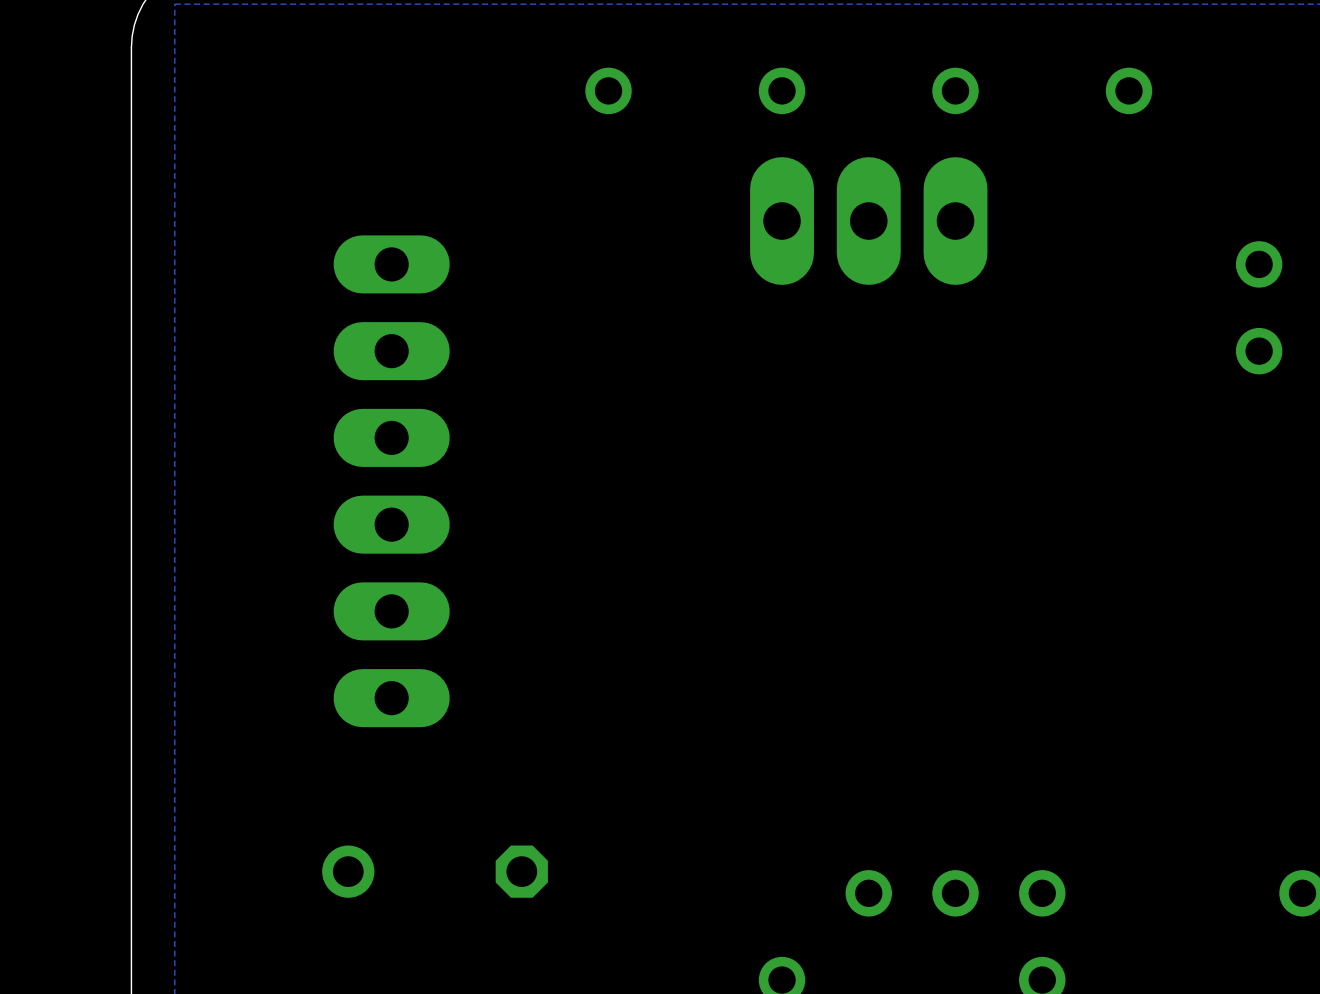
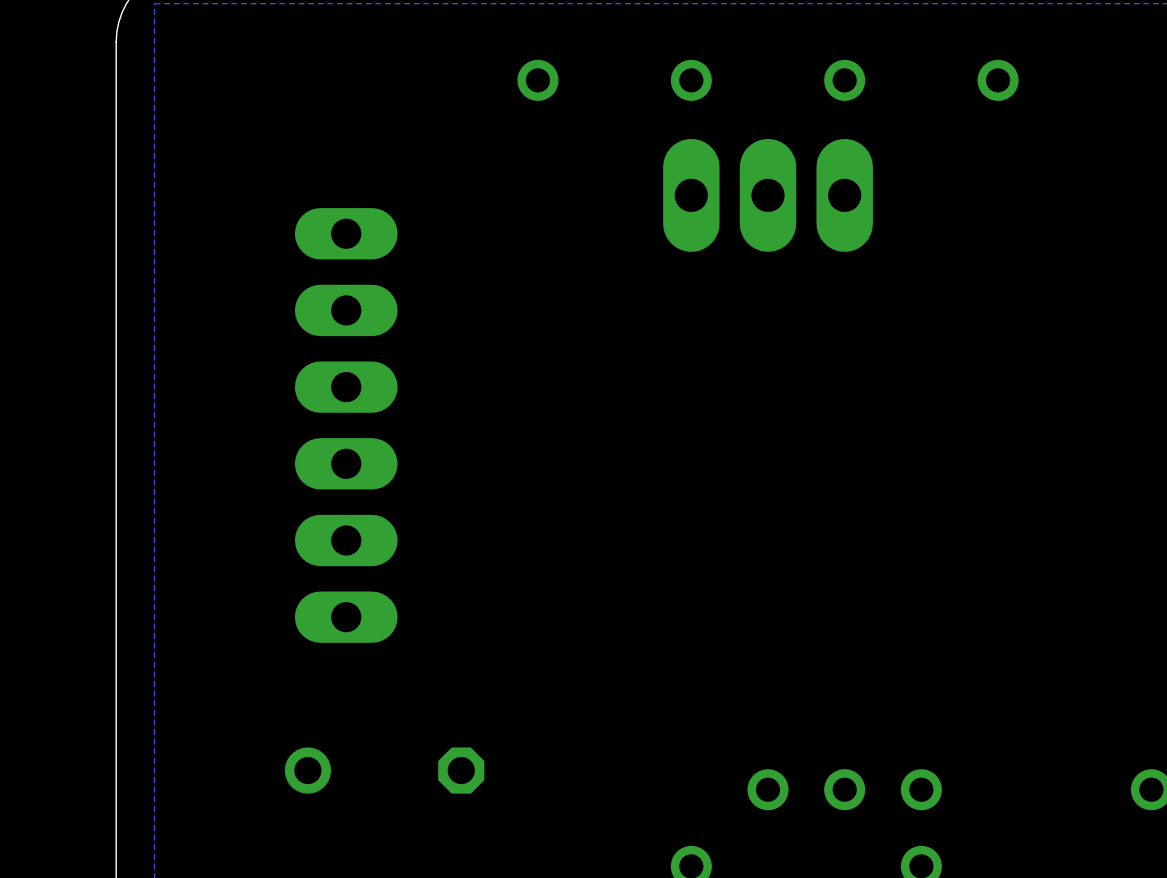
part: (1259, 307) -> none

